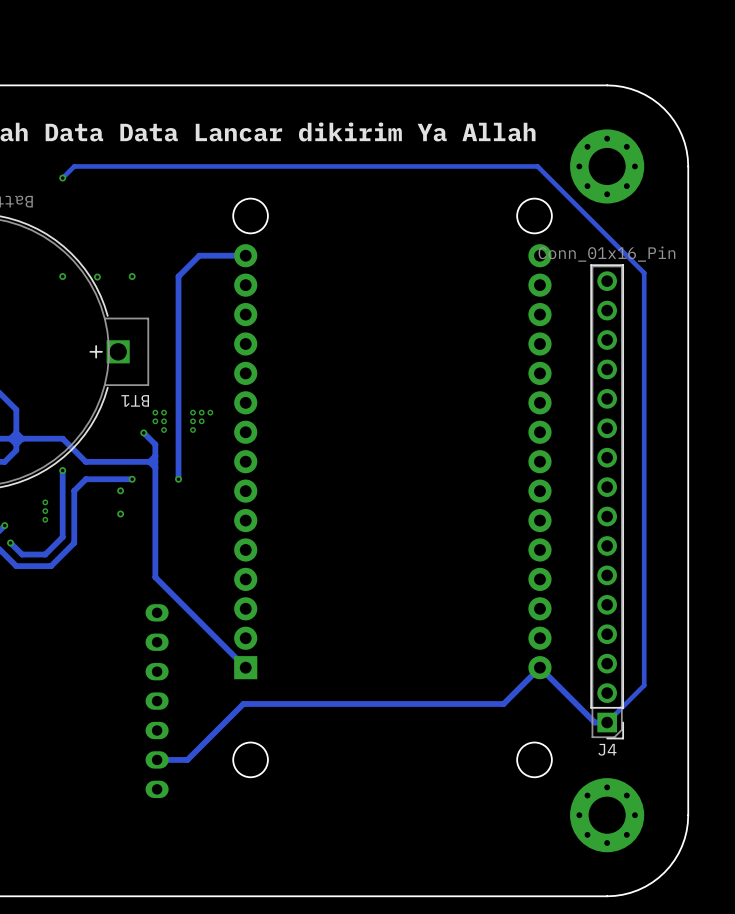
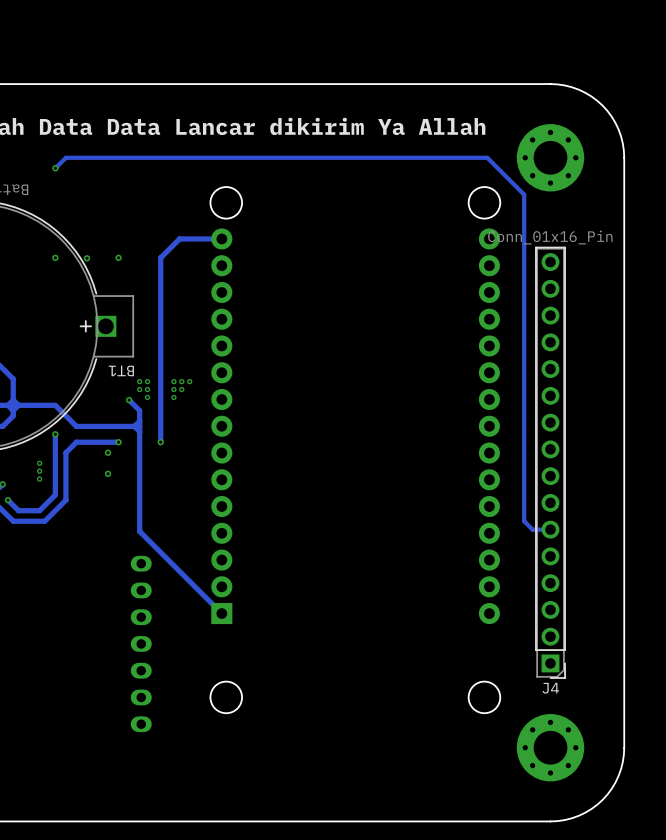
track: (578, 207) (644, 273) (644, 685) (607, 722) (594, 722) (539, 667) (503, 703) (243, 703) (187, 759) (157, 759) -> (524, 194) (524, 521) (532, 529) (550, 529)

